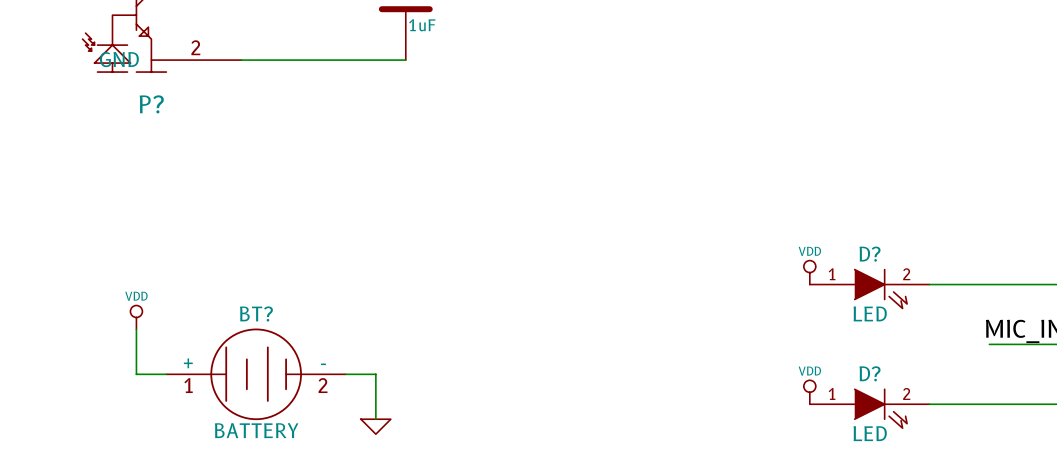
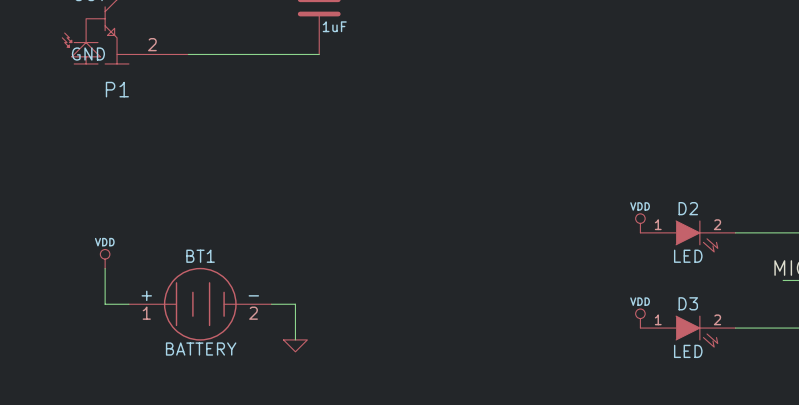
P? name: P? (151, 104) -> P1 (117, 89)
D? name: D? (870, 254) -> D2 (688, 208)
BT? name: BT? (256, 313) -> BT1 (200, 256)
D? name: D? (870, 373) -> D3 (688, 303)

